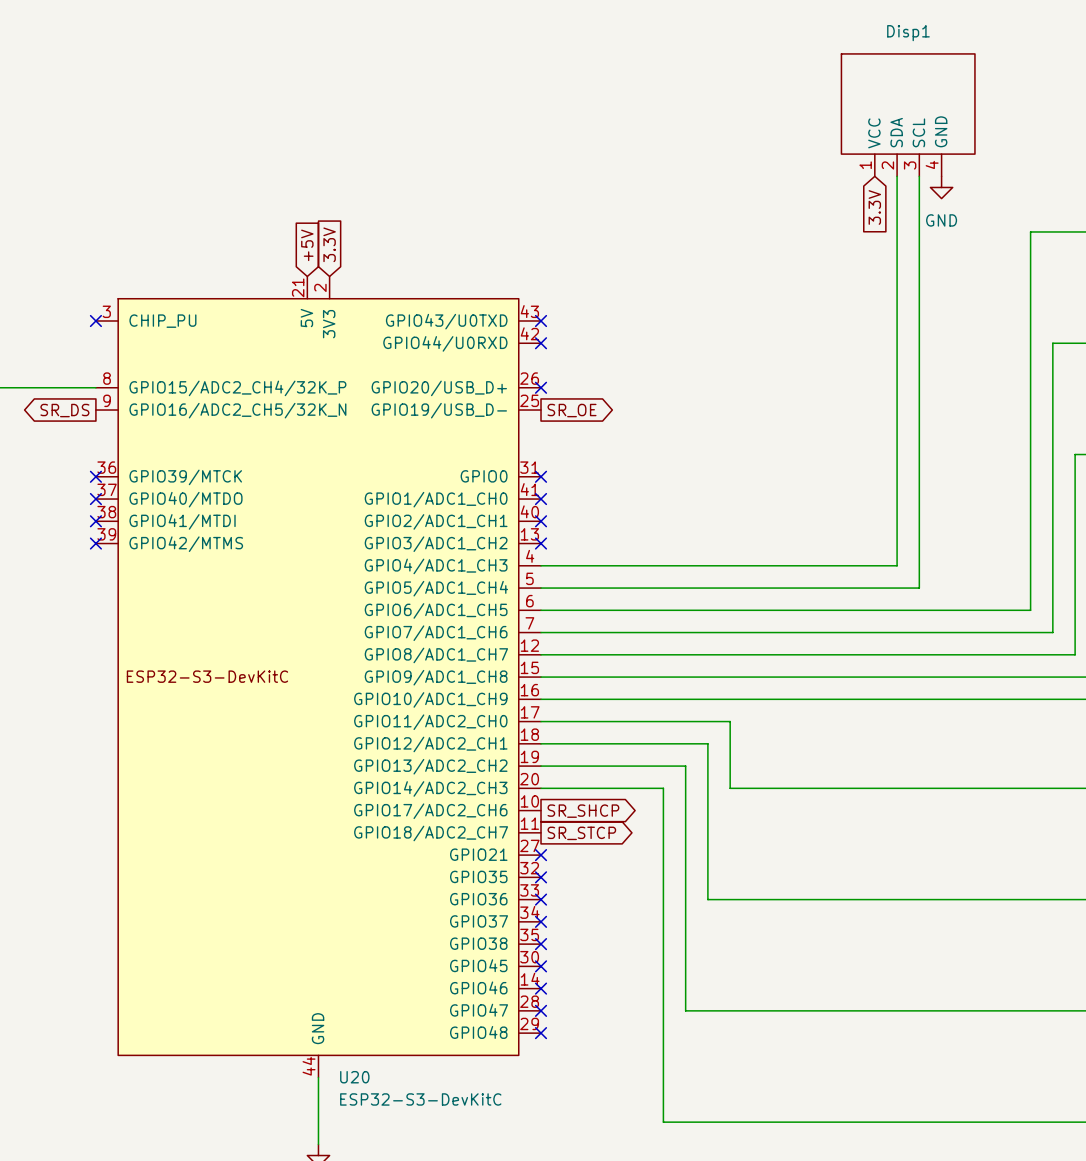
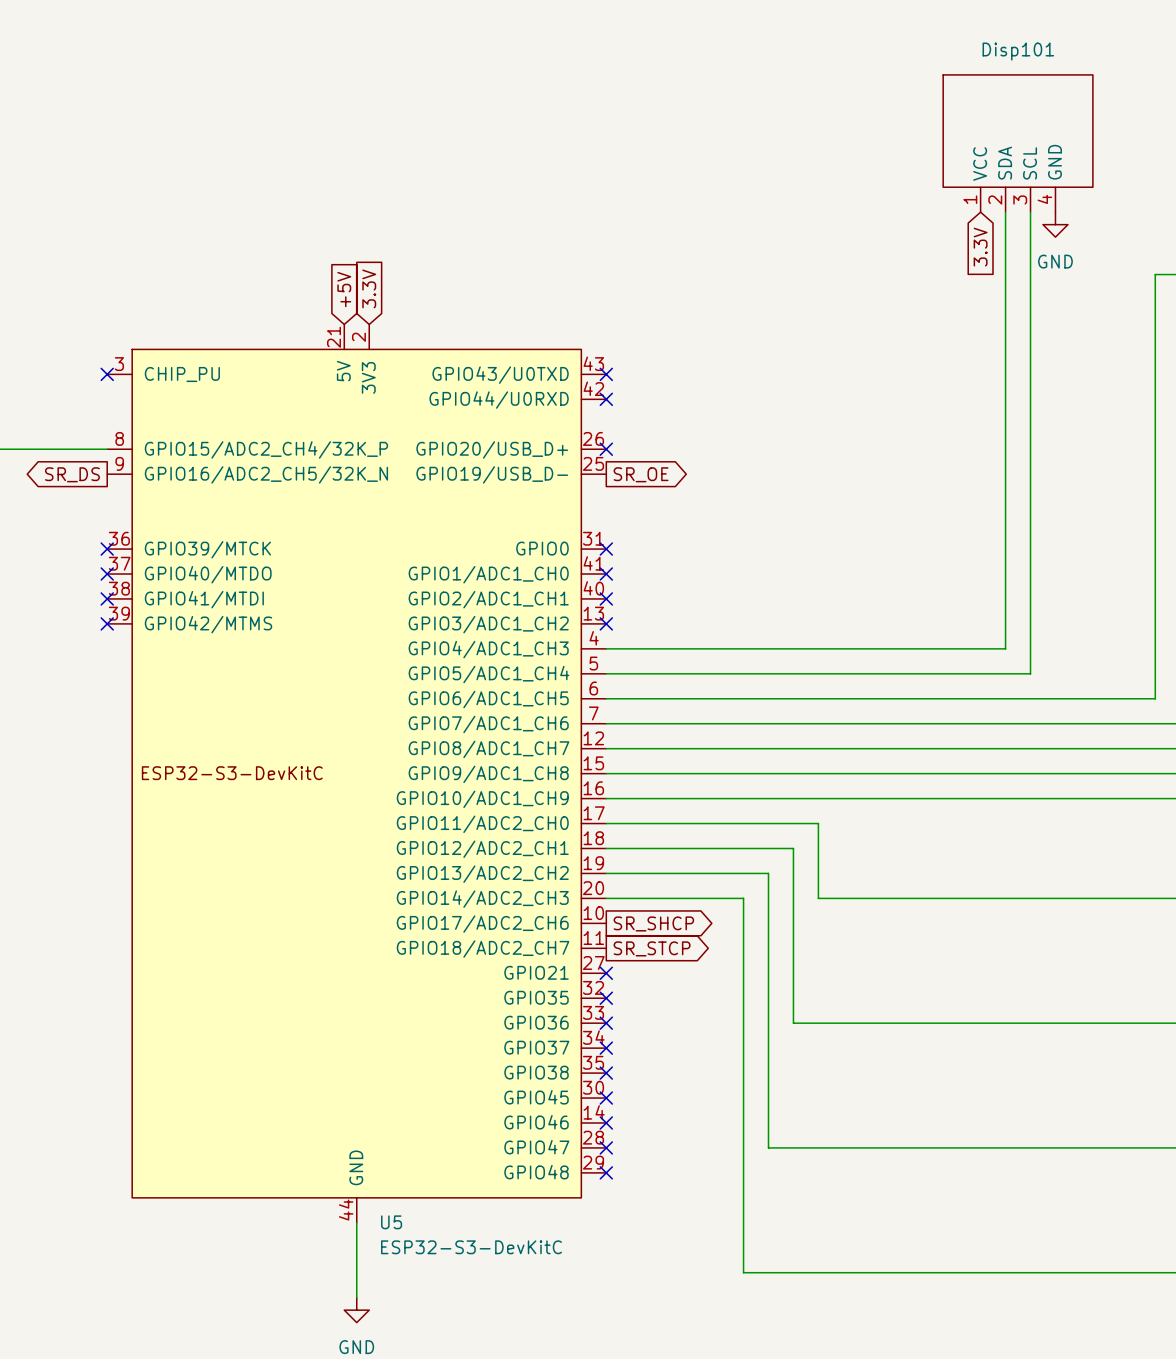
Disp1 name: Disp1 (908, 33) -> Disp101 (1018, 51)
U20 name: U20 (354, 1077) -> U5 (391, 1222)

